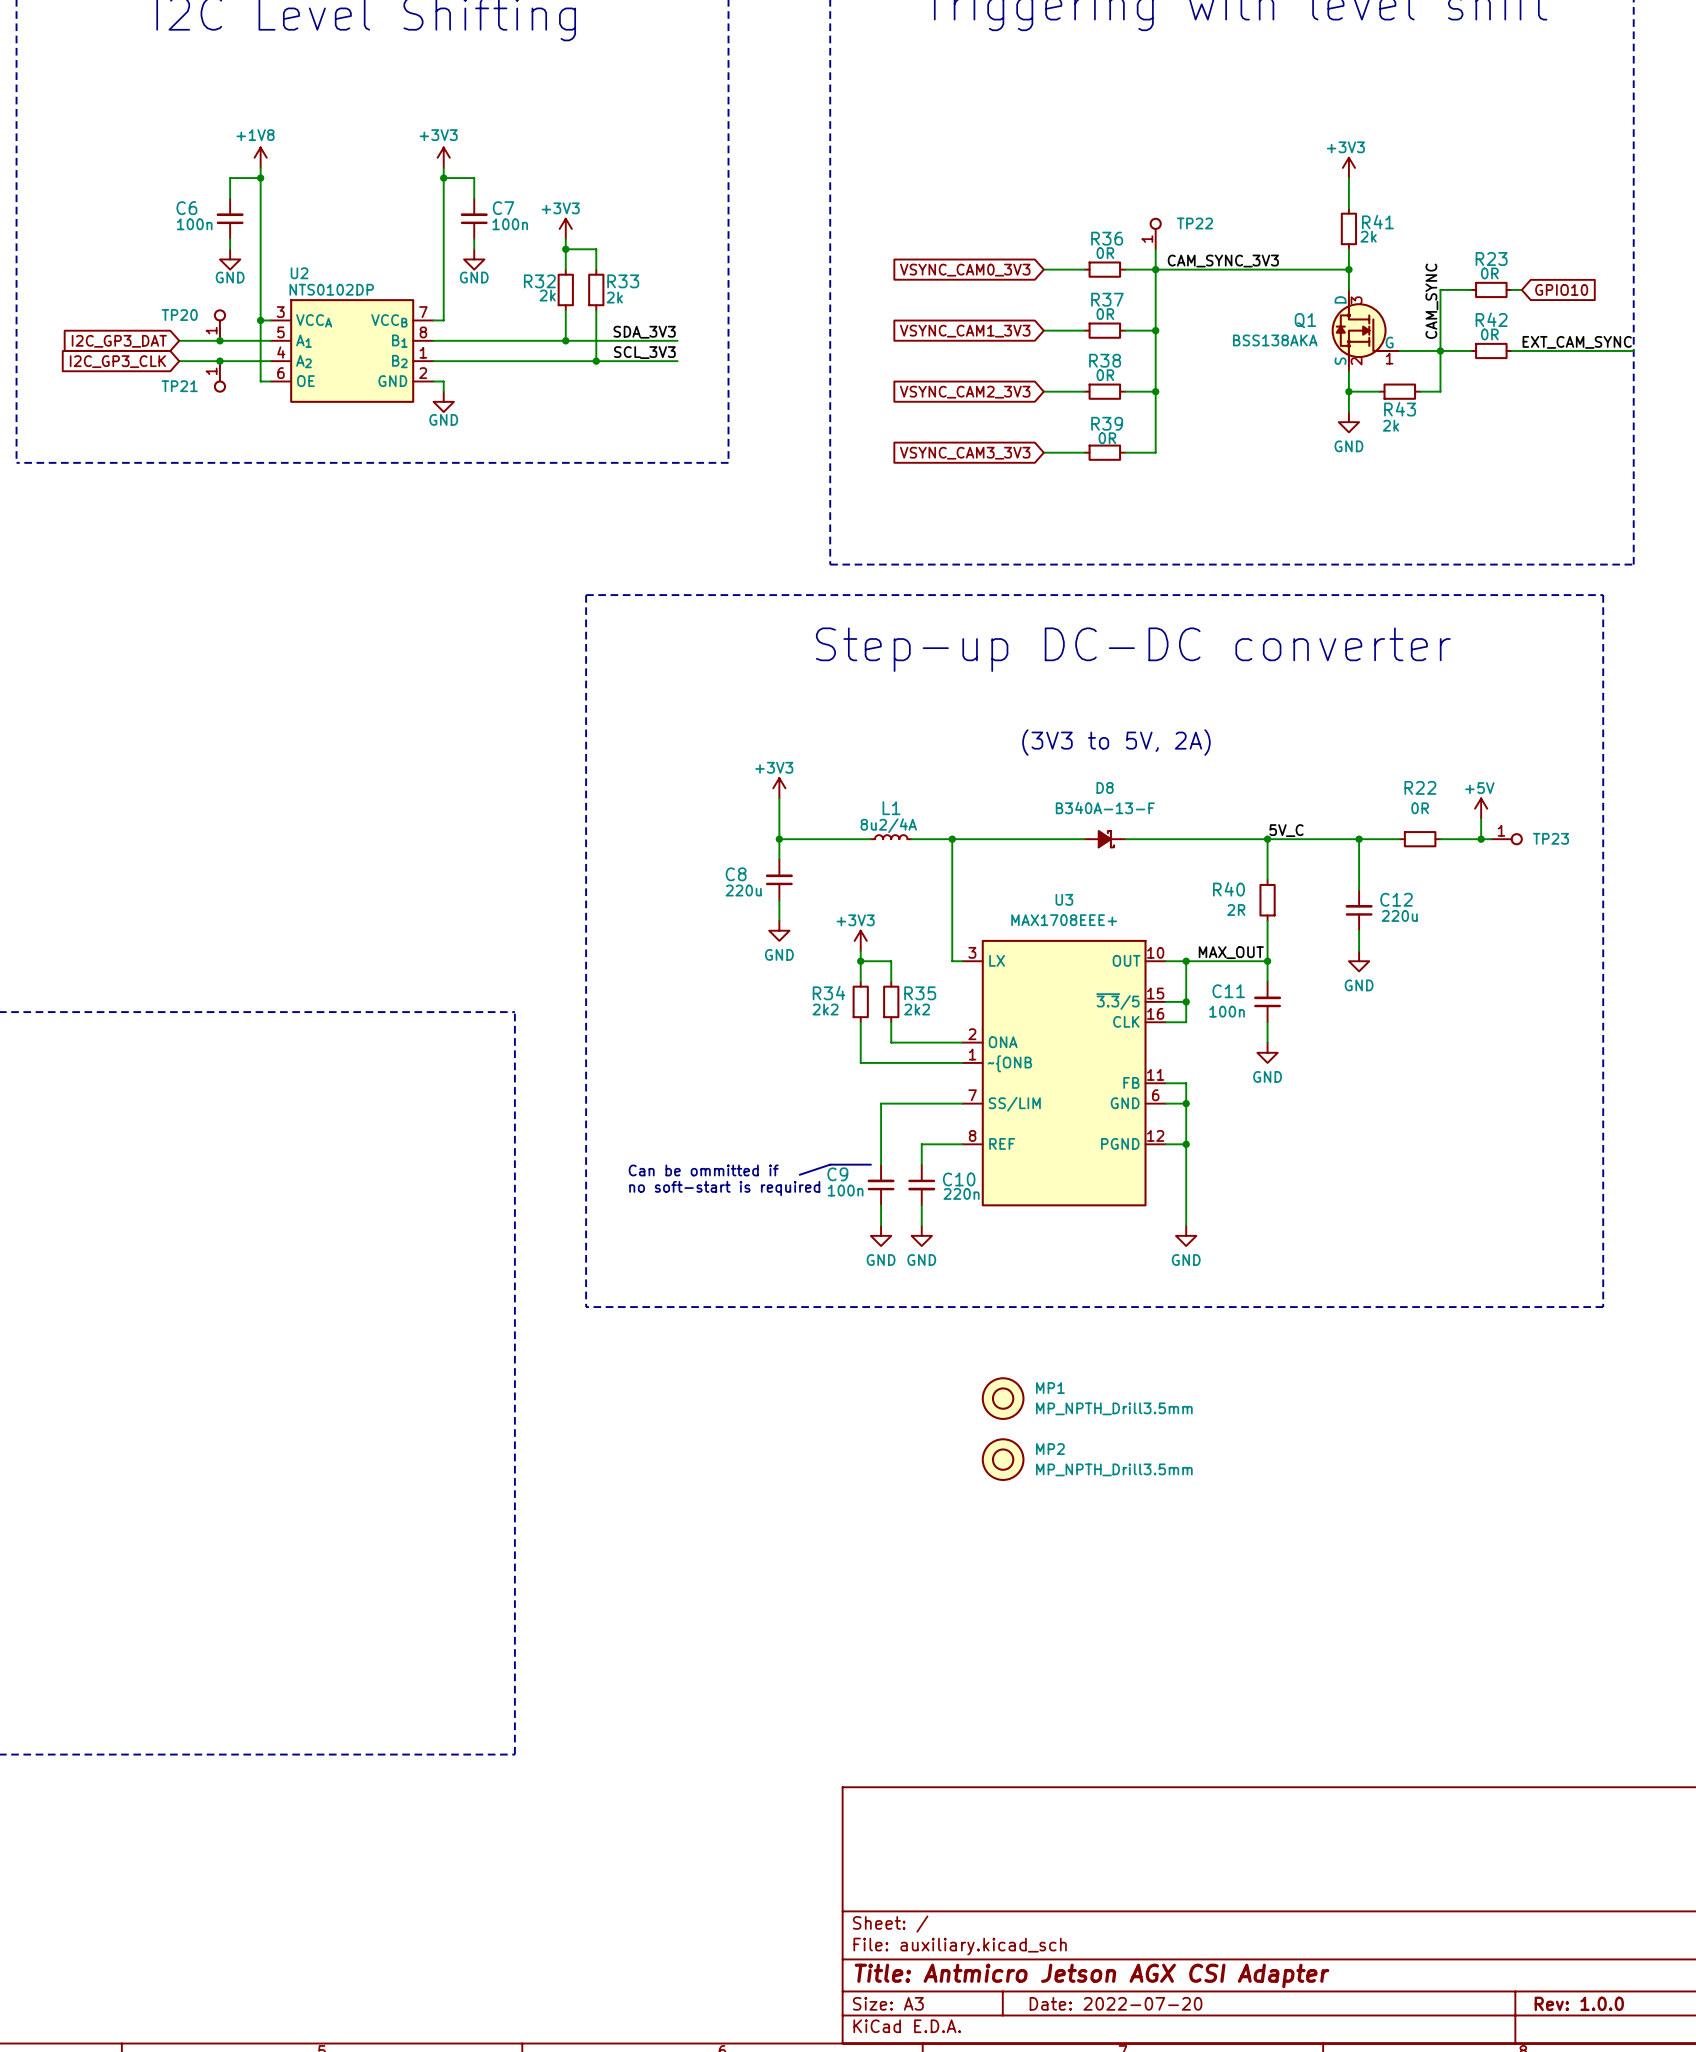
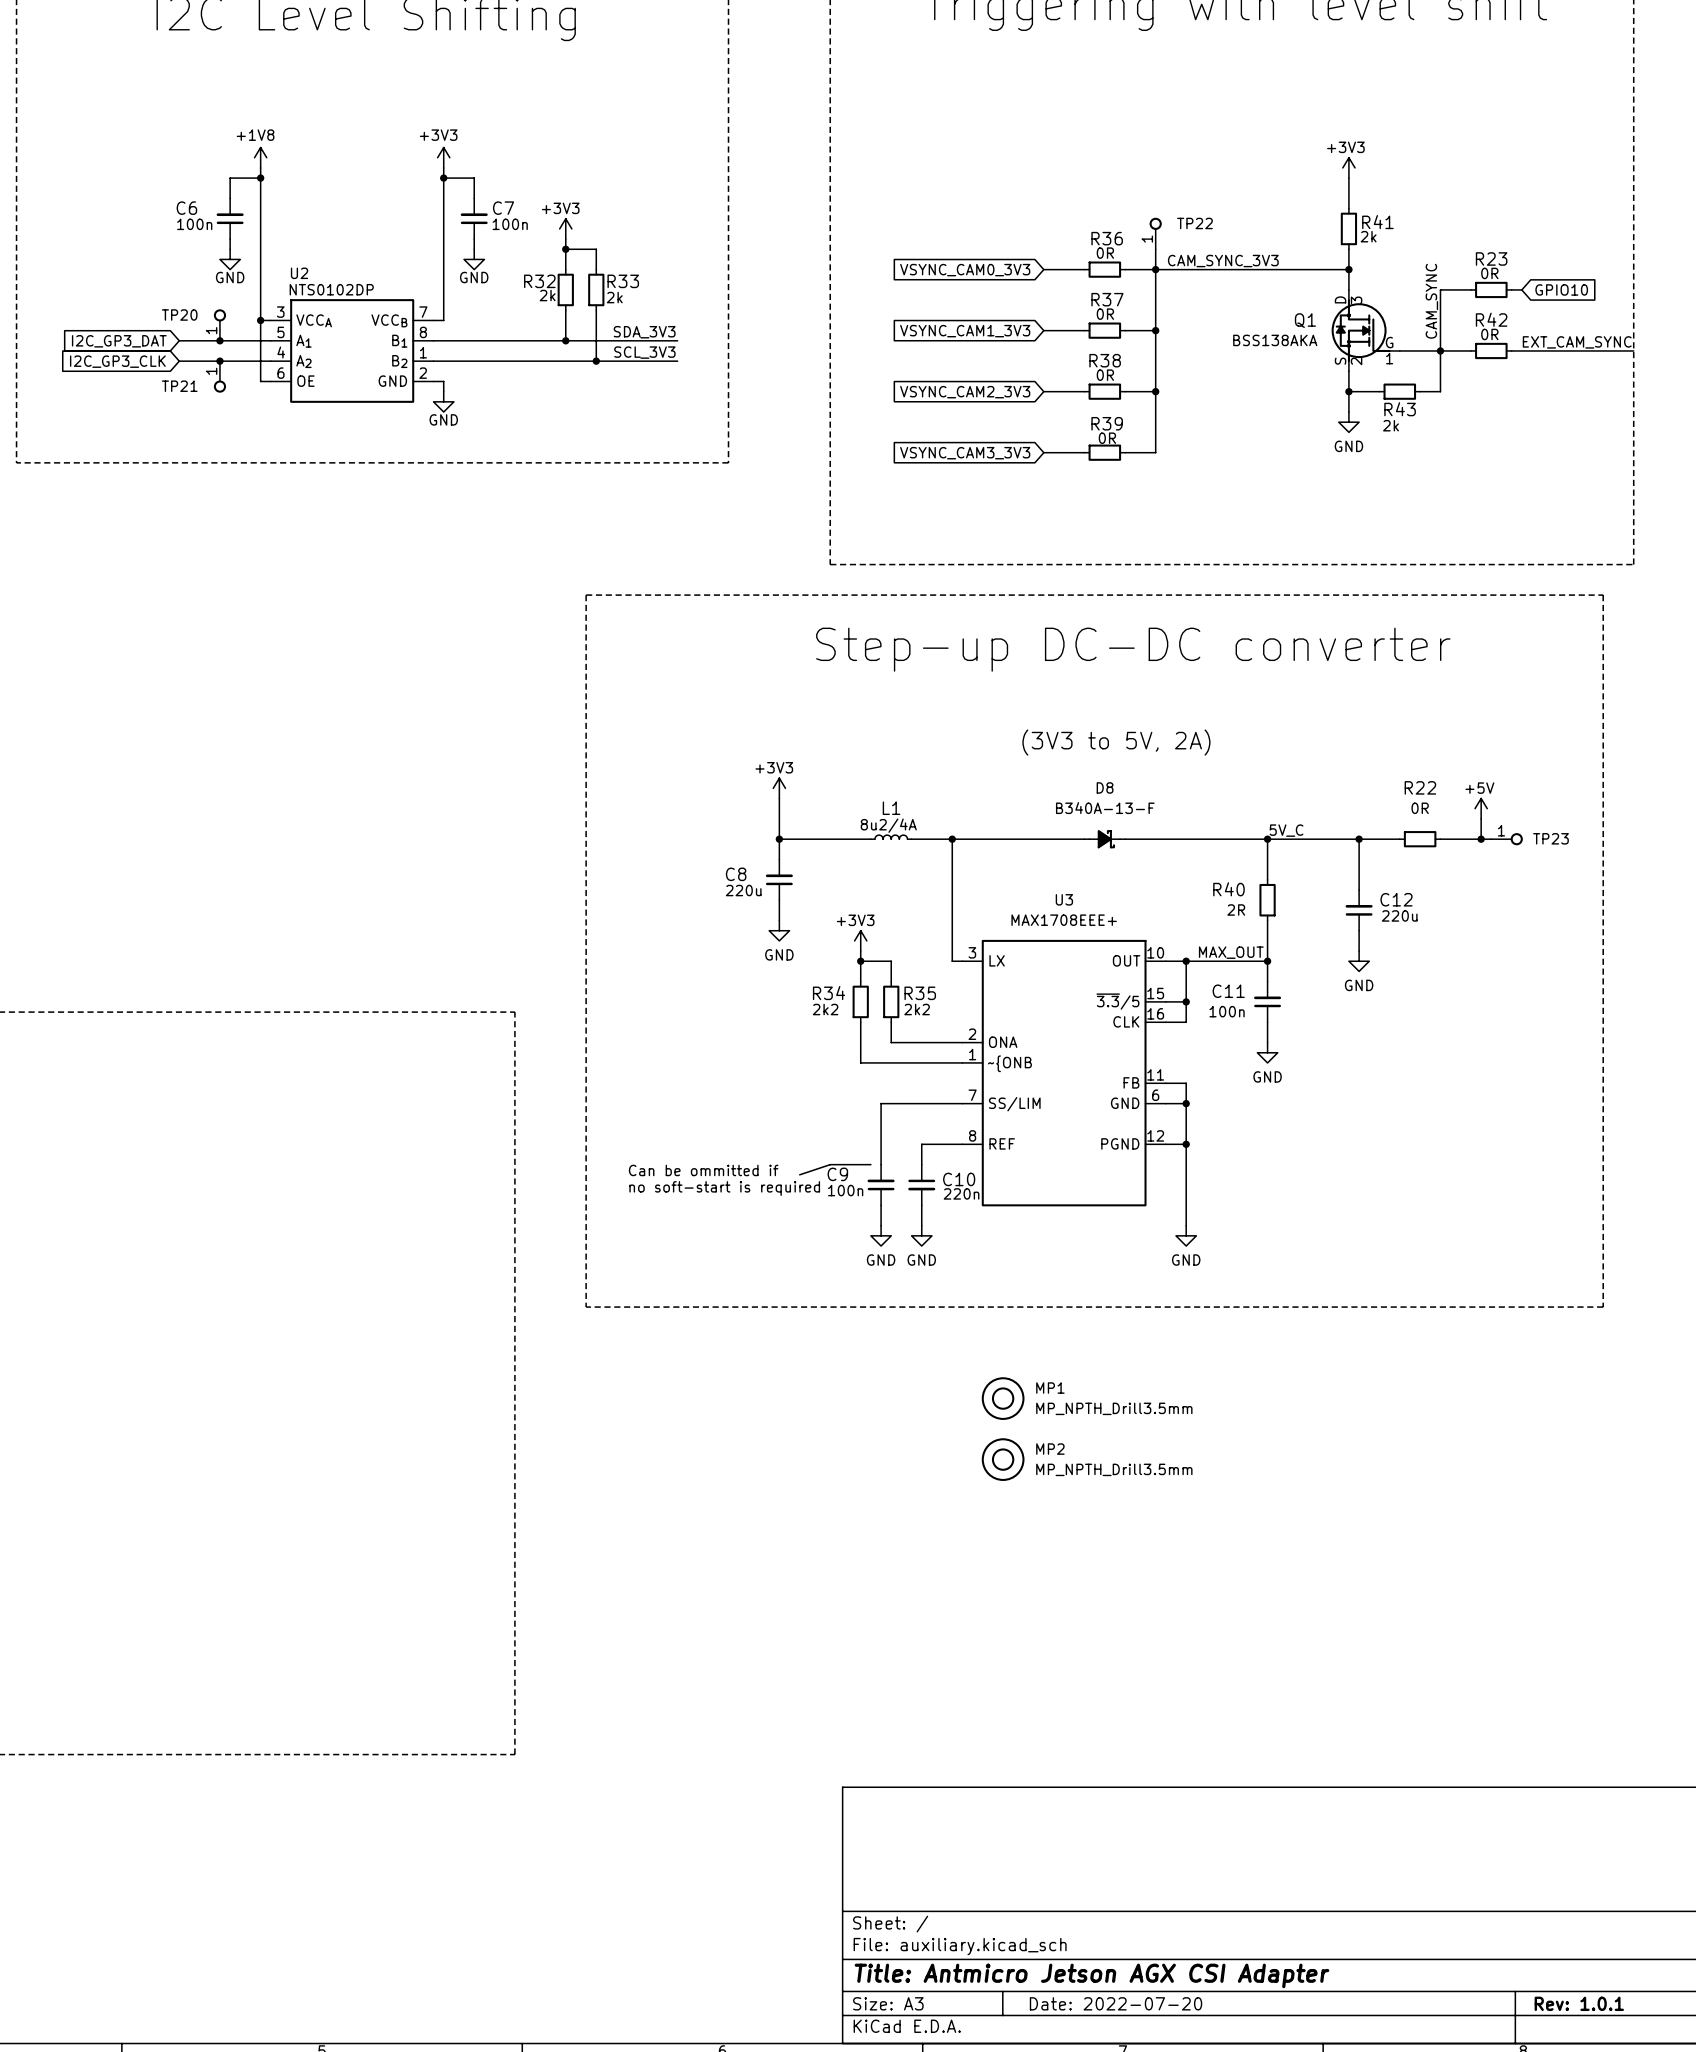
title block: Rev: 1.0.0 (1579, 2003) -> Rev: 1.0.1 (1579, 2003)

